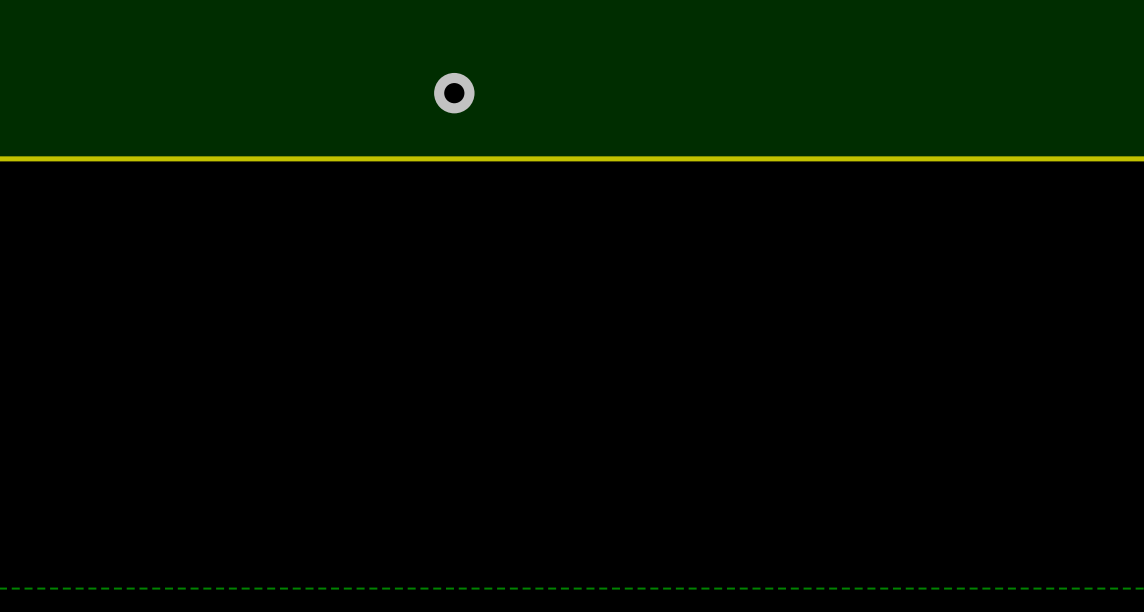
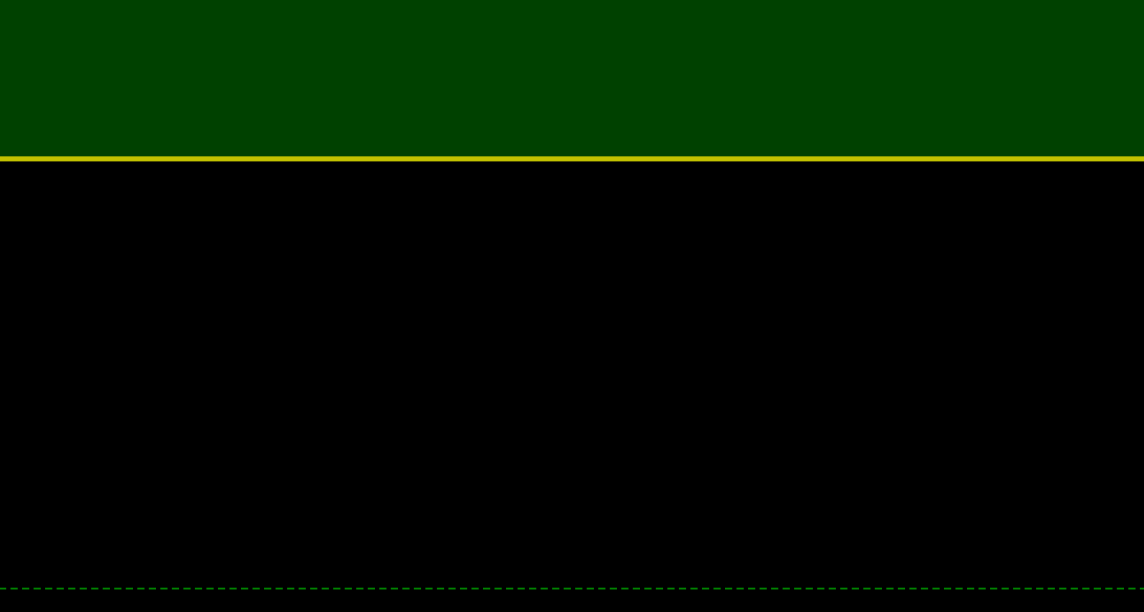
via: (454, 93) -> none

